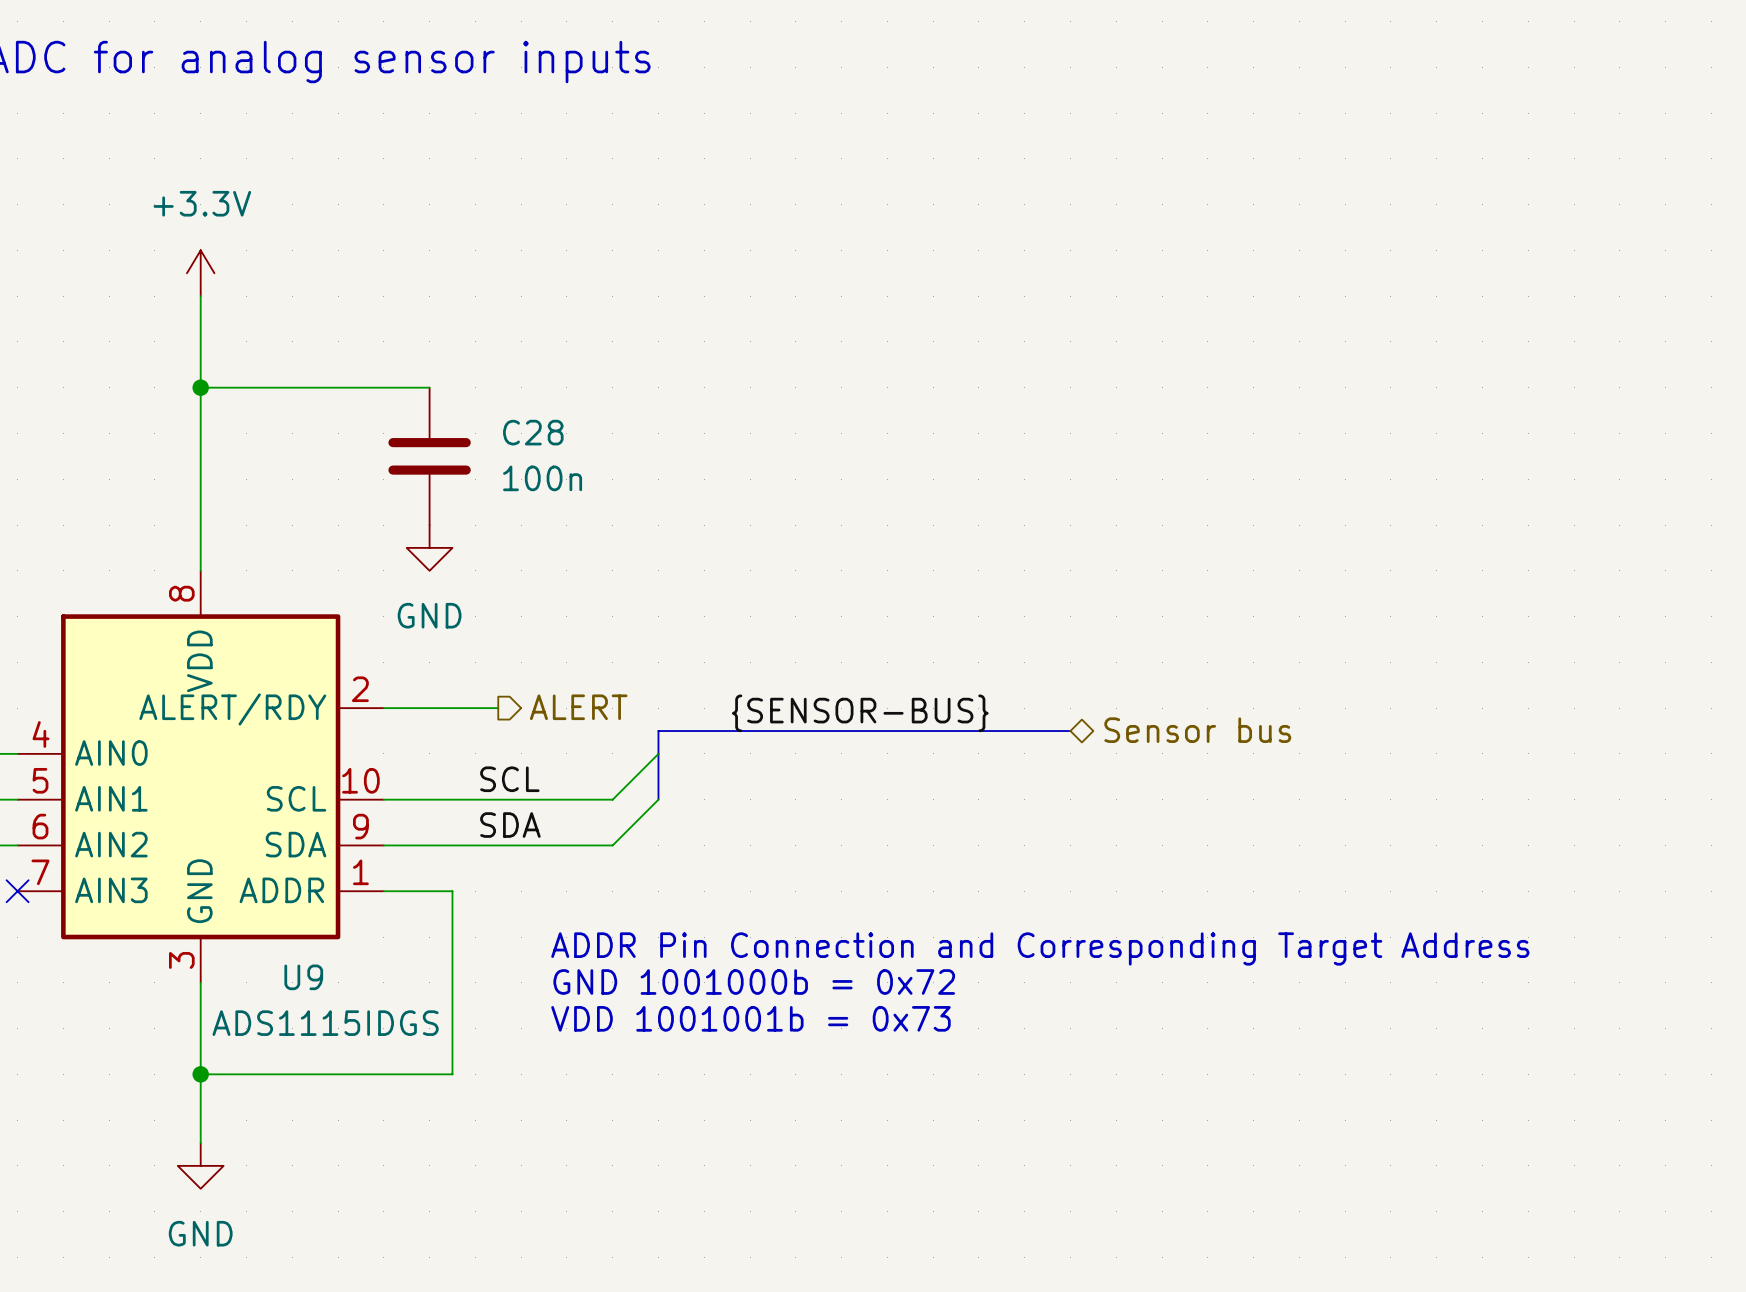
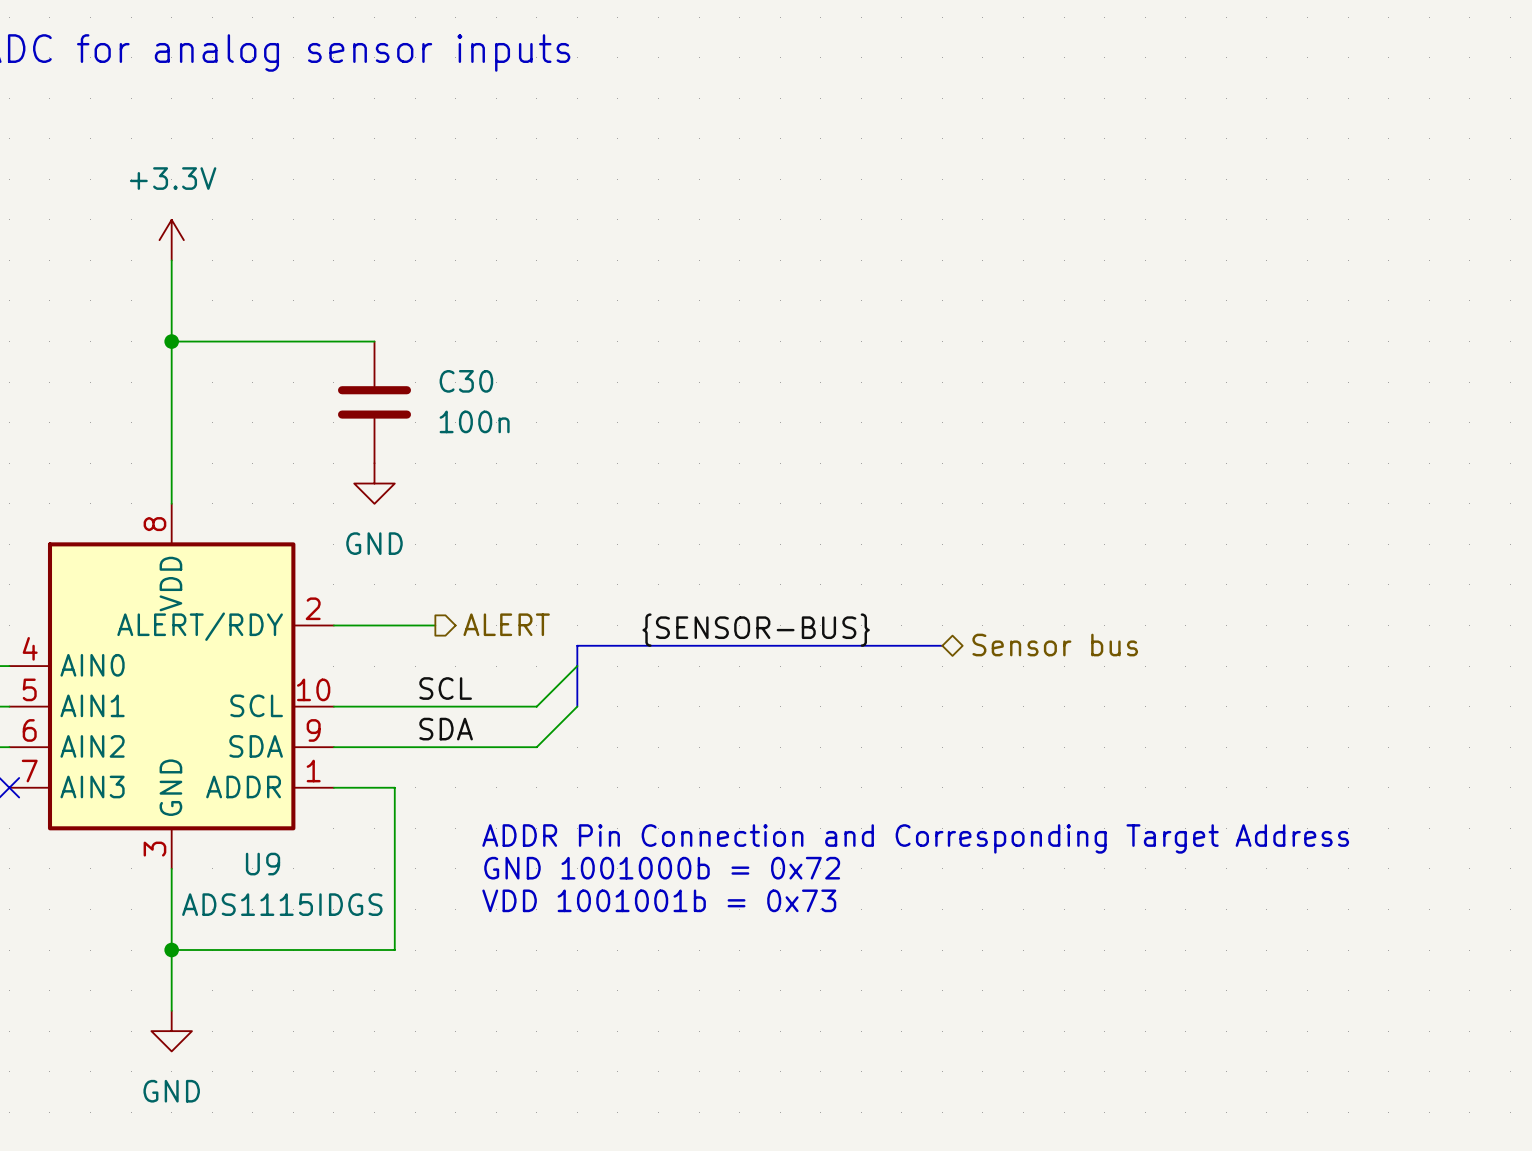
C28 name: C28 (533, 432) -> C30 (466, 381)

